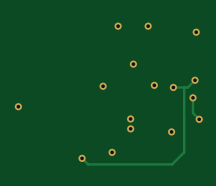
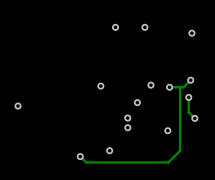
via position: (133, 64) -> (137, 102)

